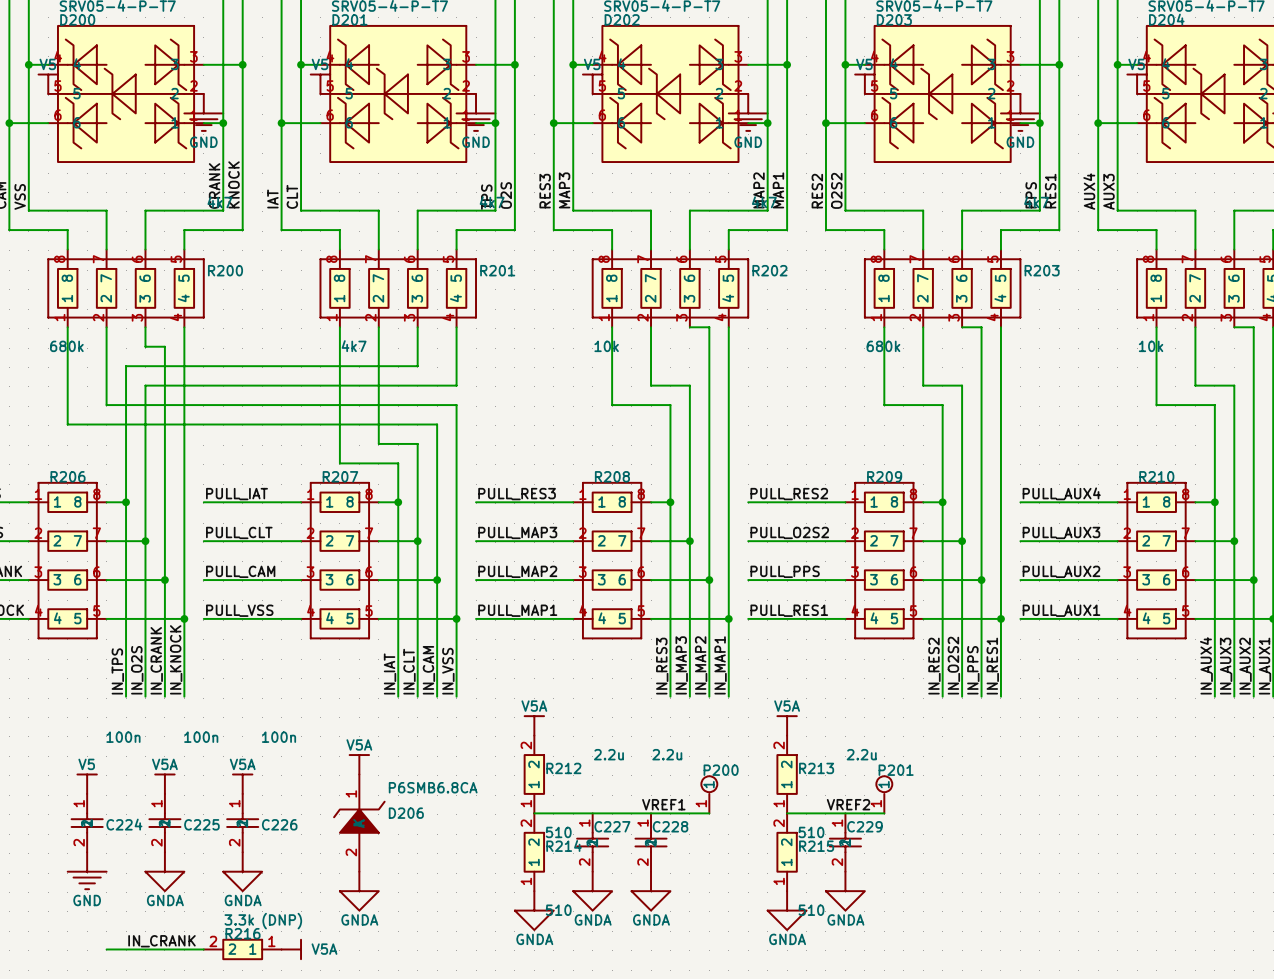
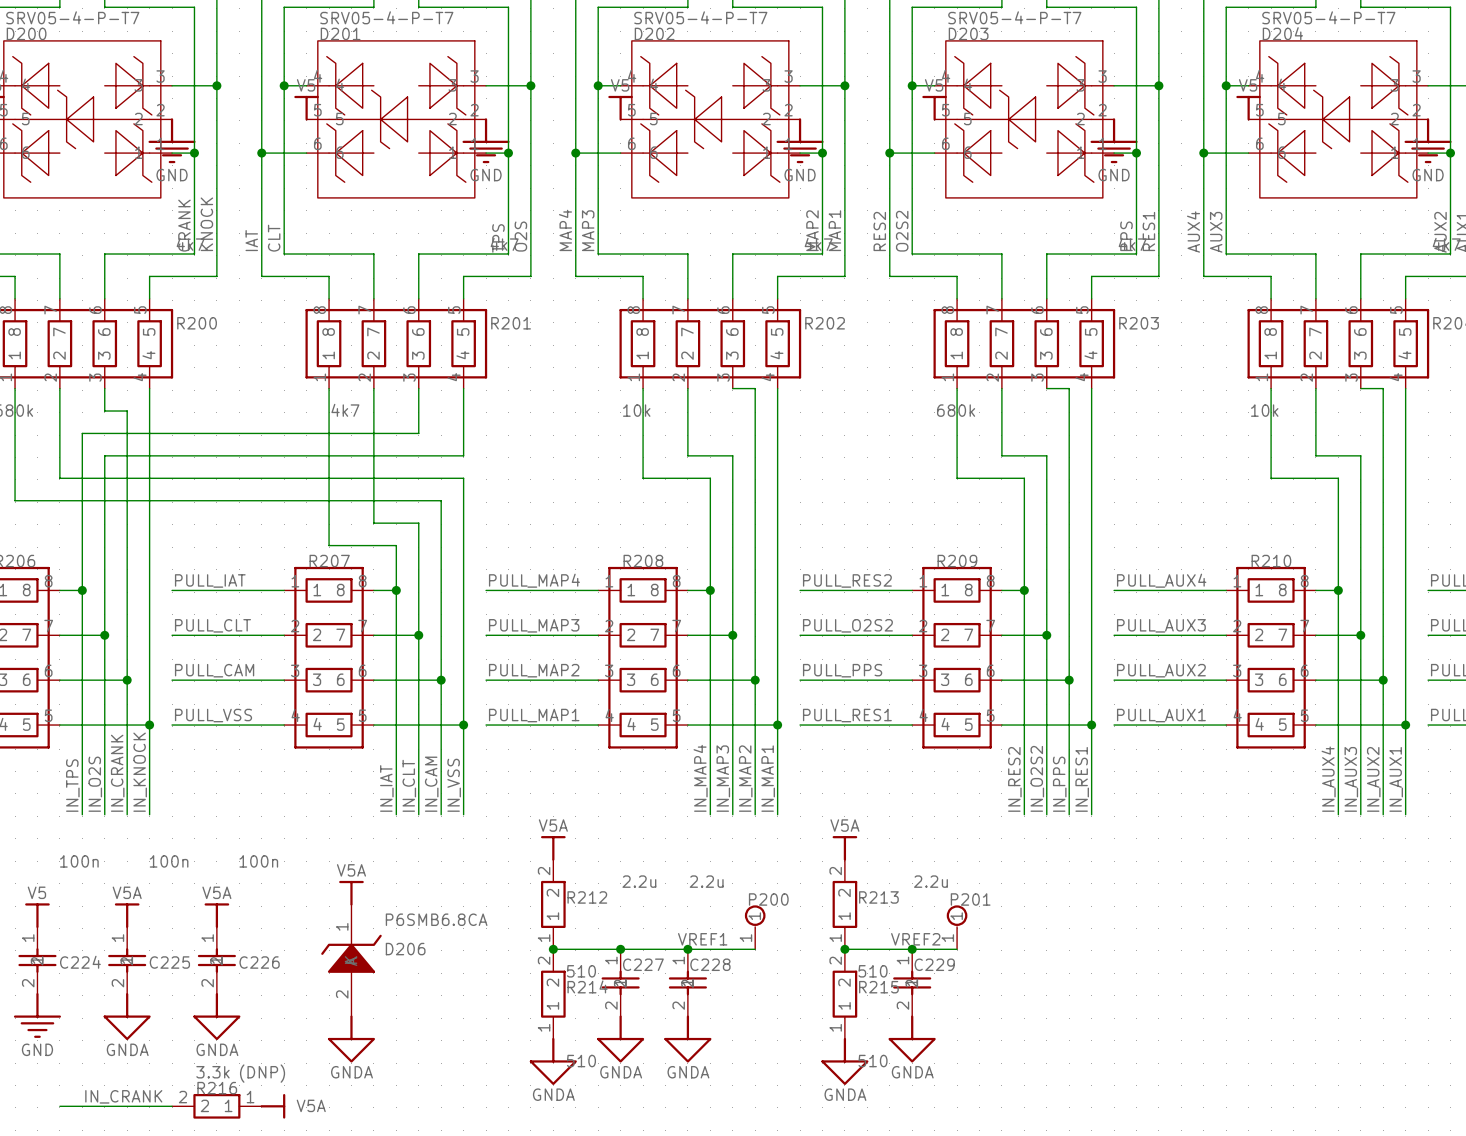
label: RES3 (545, 191) -> MAP4 (565, 230)
label: PULL_RES3 (517, 494) -> PULL_MAP4 (534, 580)
label: IN_RES3 (662, 666) -> IN_MAP4 (700, 778)
junction: none -> (553, 949)
junction: none -> (620, 949)
junction: none -> (687, 949)
junction: none -> (844, 949)
junction: none -> (912, 949)

